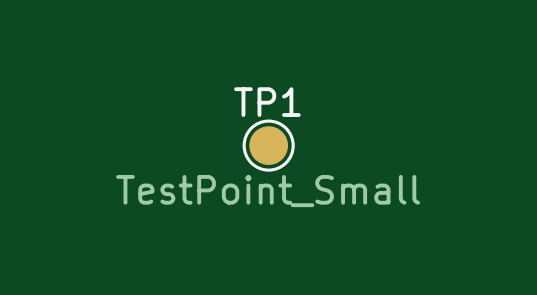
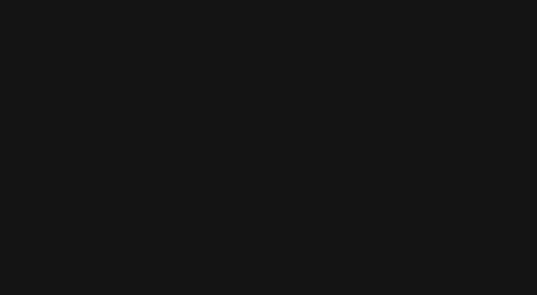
TP1: TestPoint_Small (268, 145) -> none

